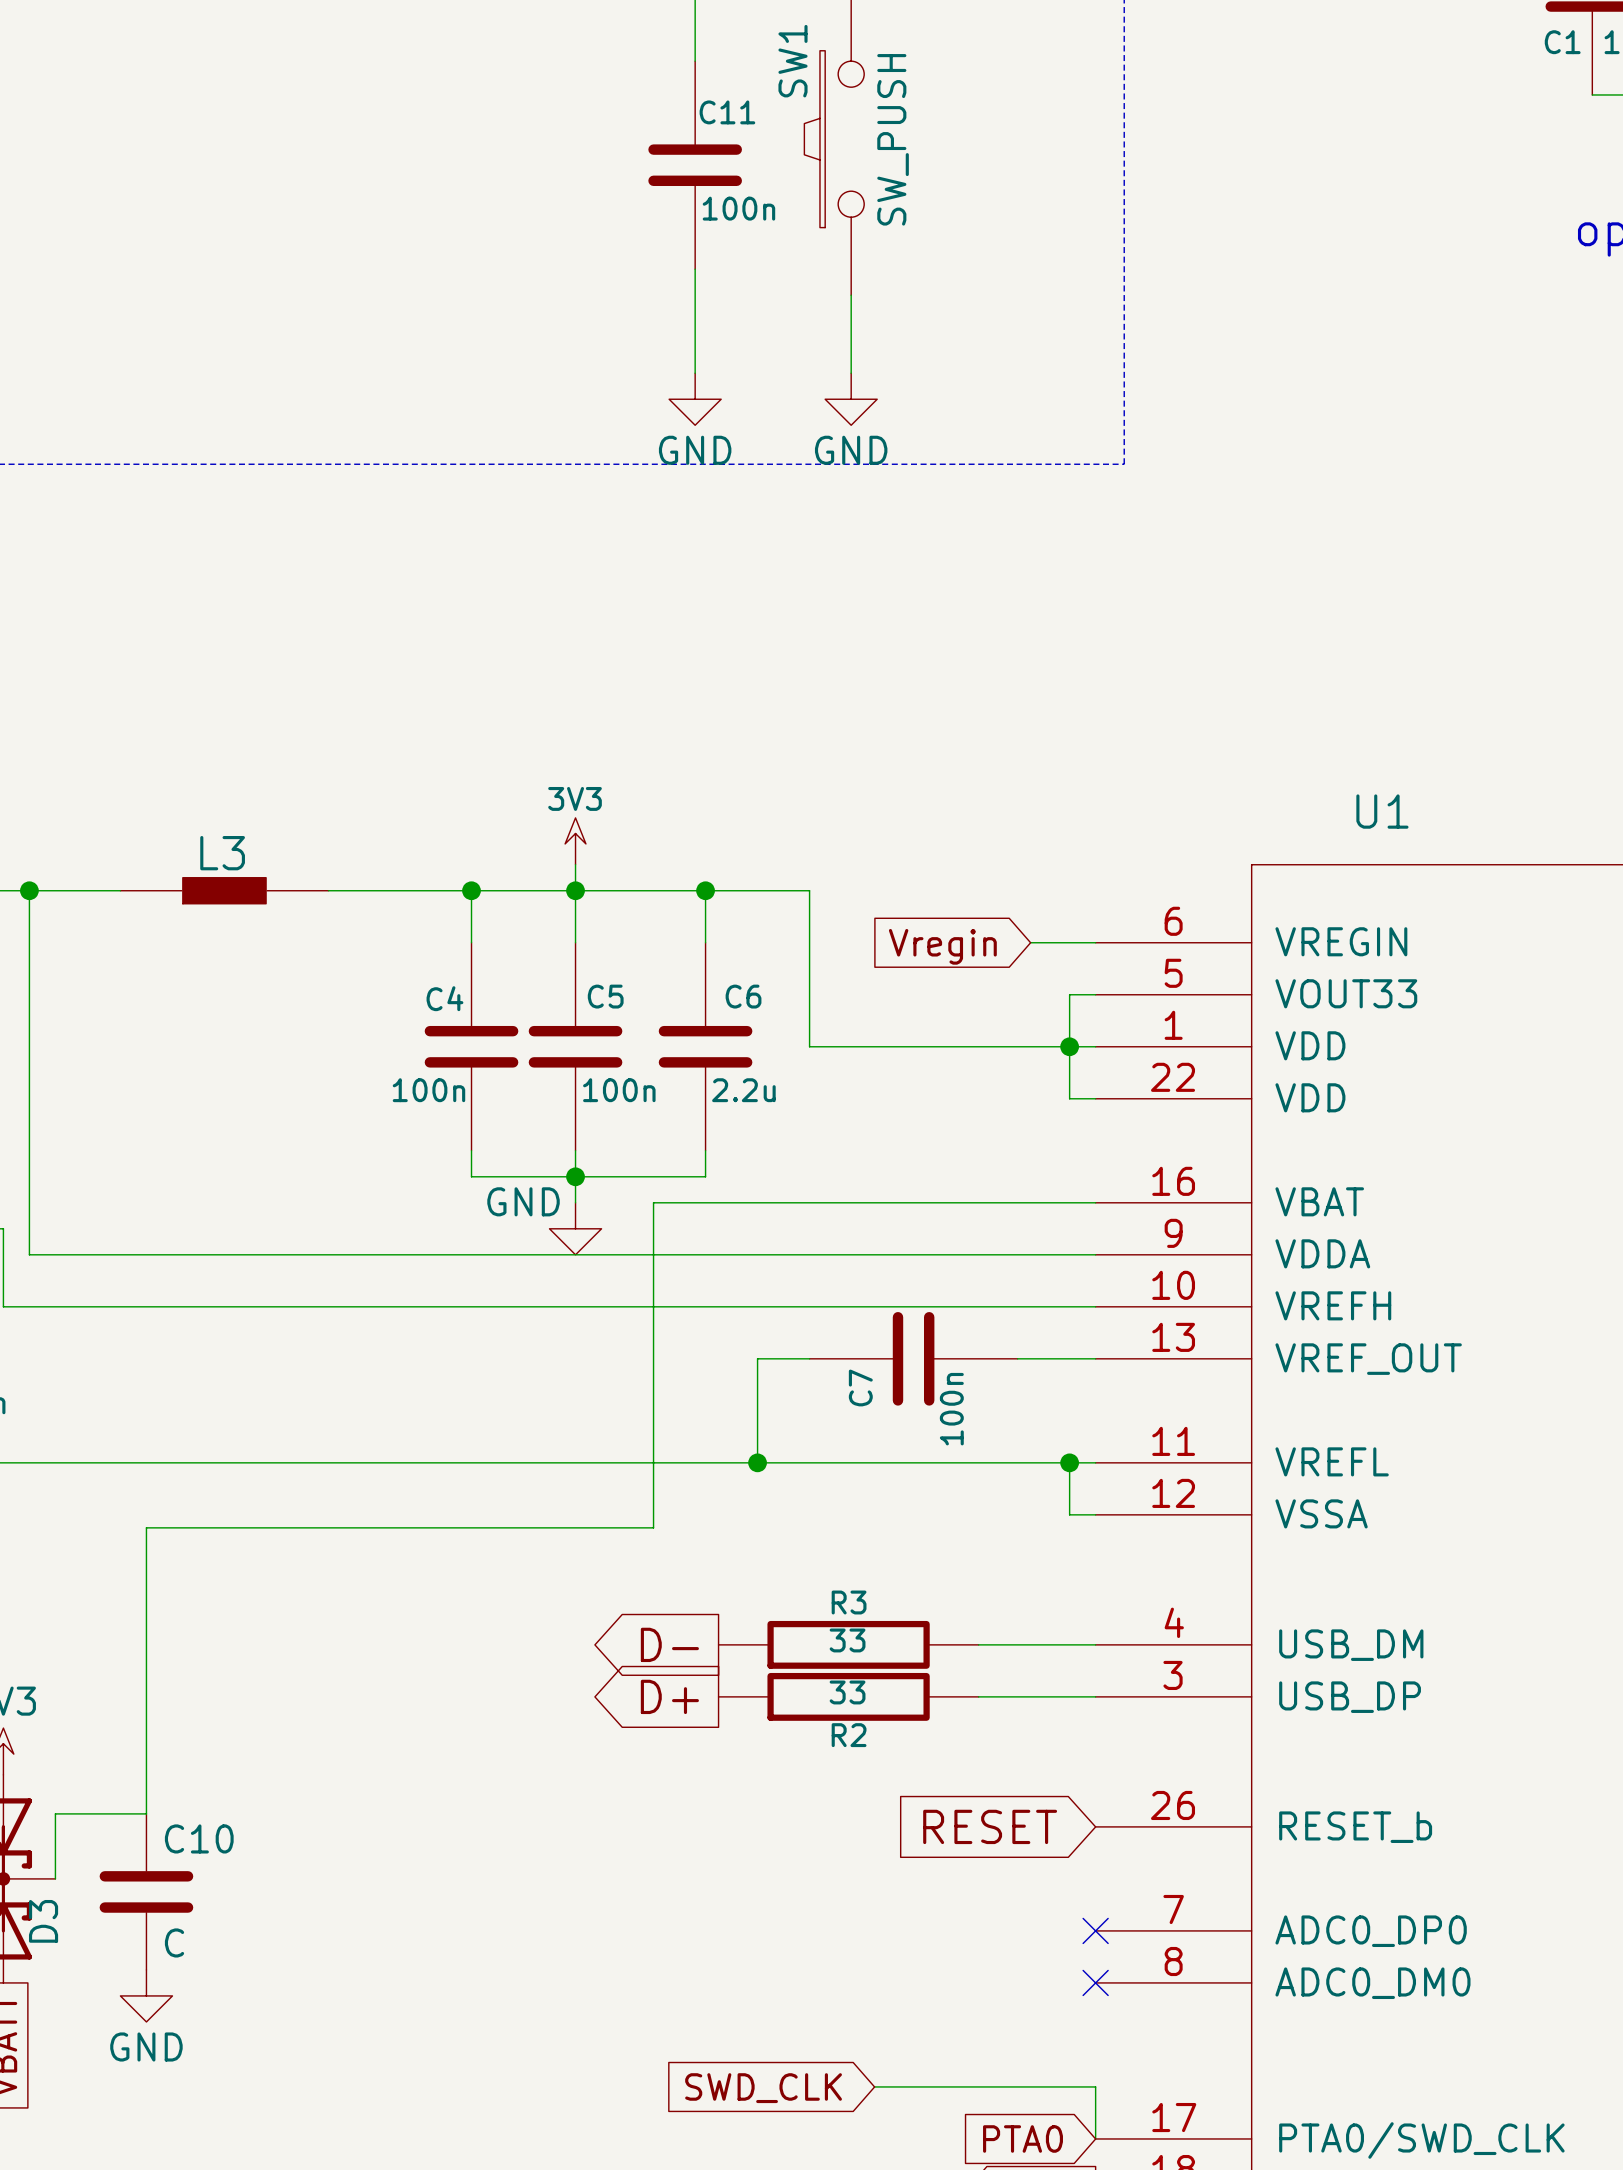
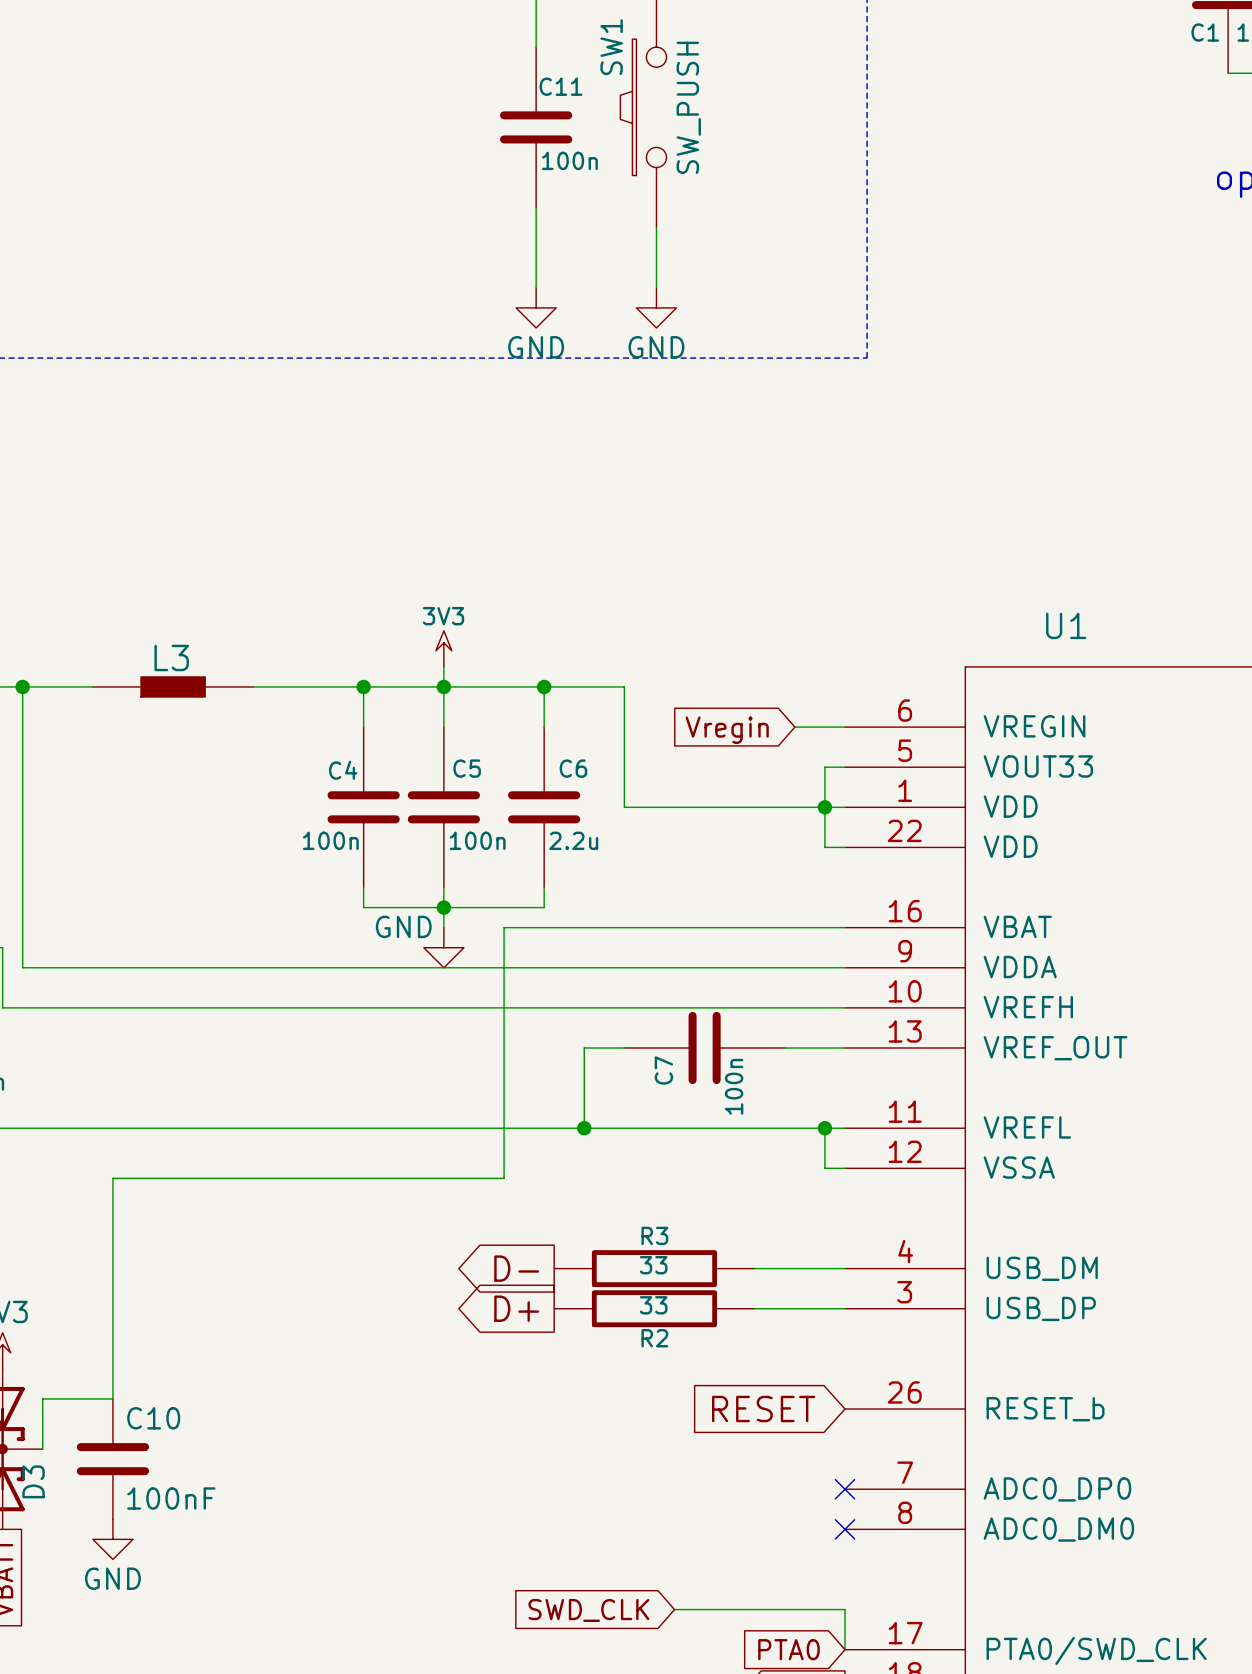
C10 value: C (174, 1942) -> 100nF (171, 1498)

